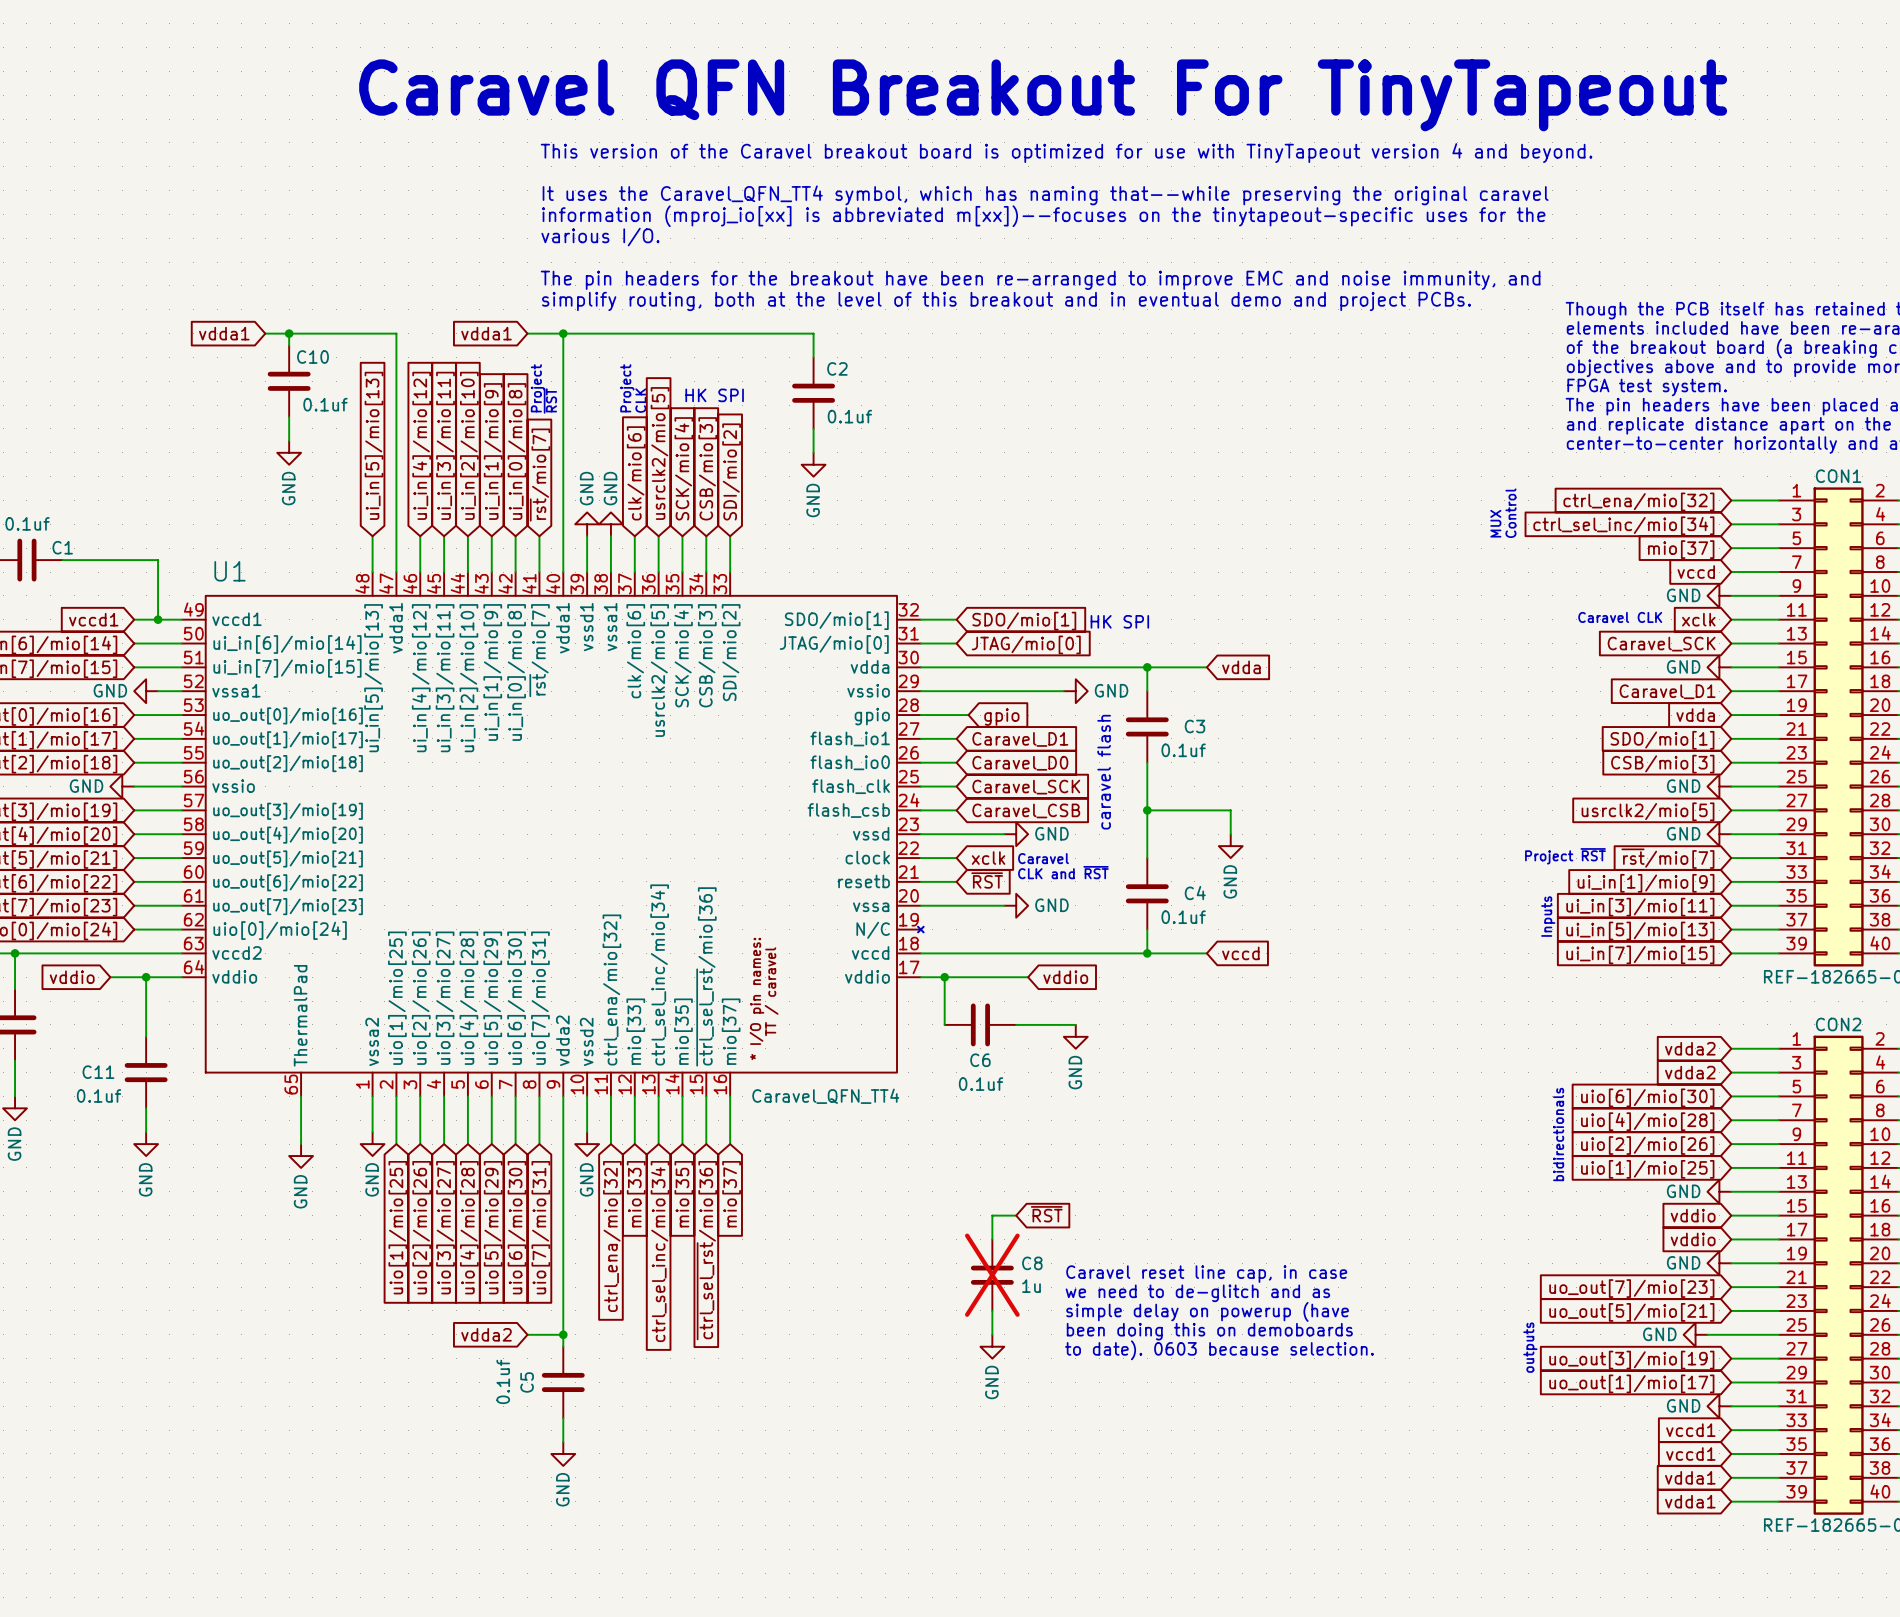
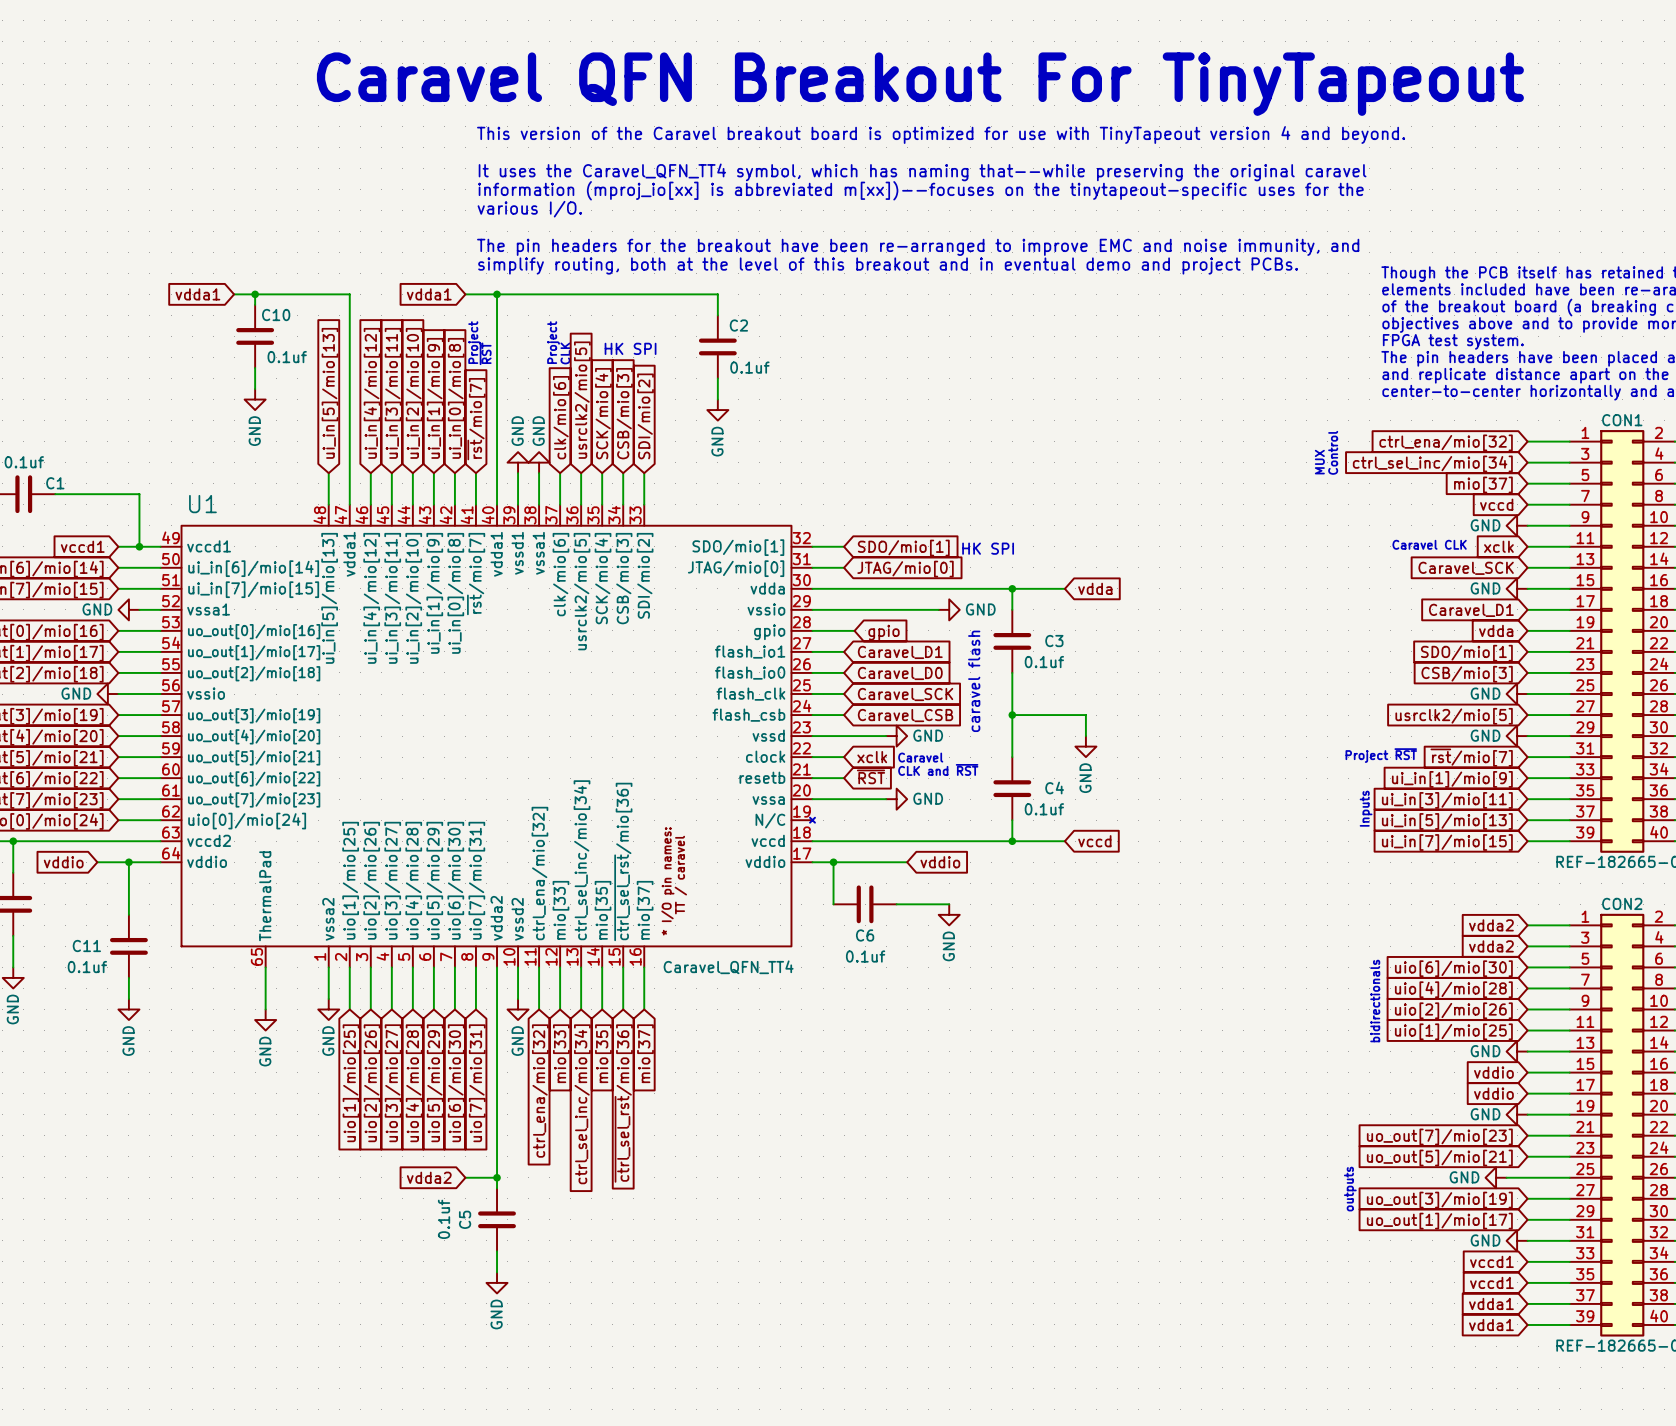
global label: ~{RST} (1046, 1214) -> none
wire: (1016, 1215) (992, 1215) (992, 1239) -> none
text: Caravel reset line cap, in case (1206, 1274) -> none
C8: (992, 1275) -> none
text: we need to de-glitch and as (1197, 1293) -> none
wire: (992, 1310) (992, 1334) -> none
text: simple delay on powerup (have (1207, 1311) -> none
text: been doing this on demoboards (1209, 1331) -> none
power symbol: GND (992, 1346) -> none
text: to date). 0603 because selection. (1219, 1350) -> none

